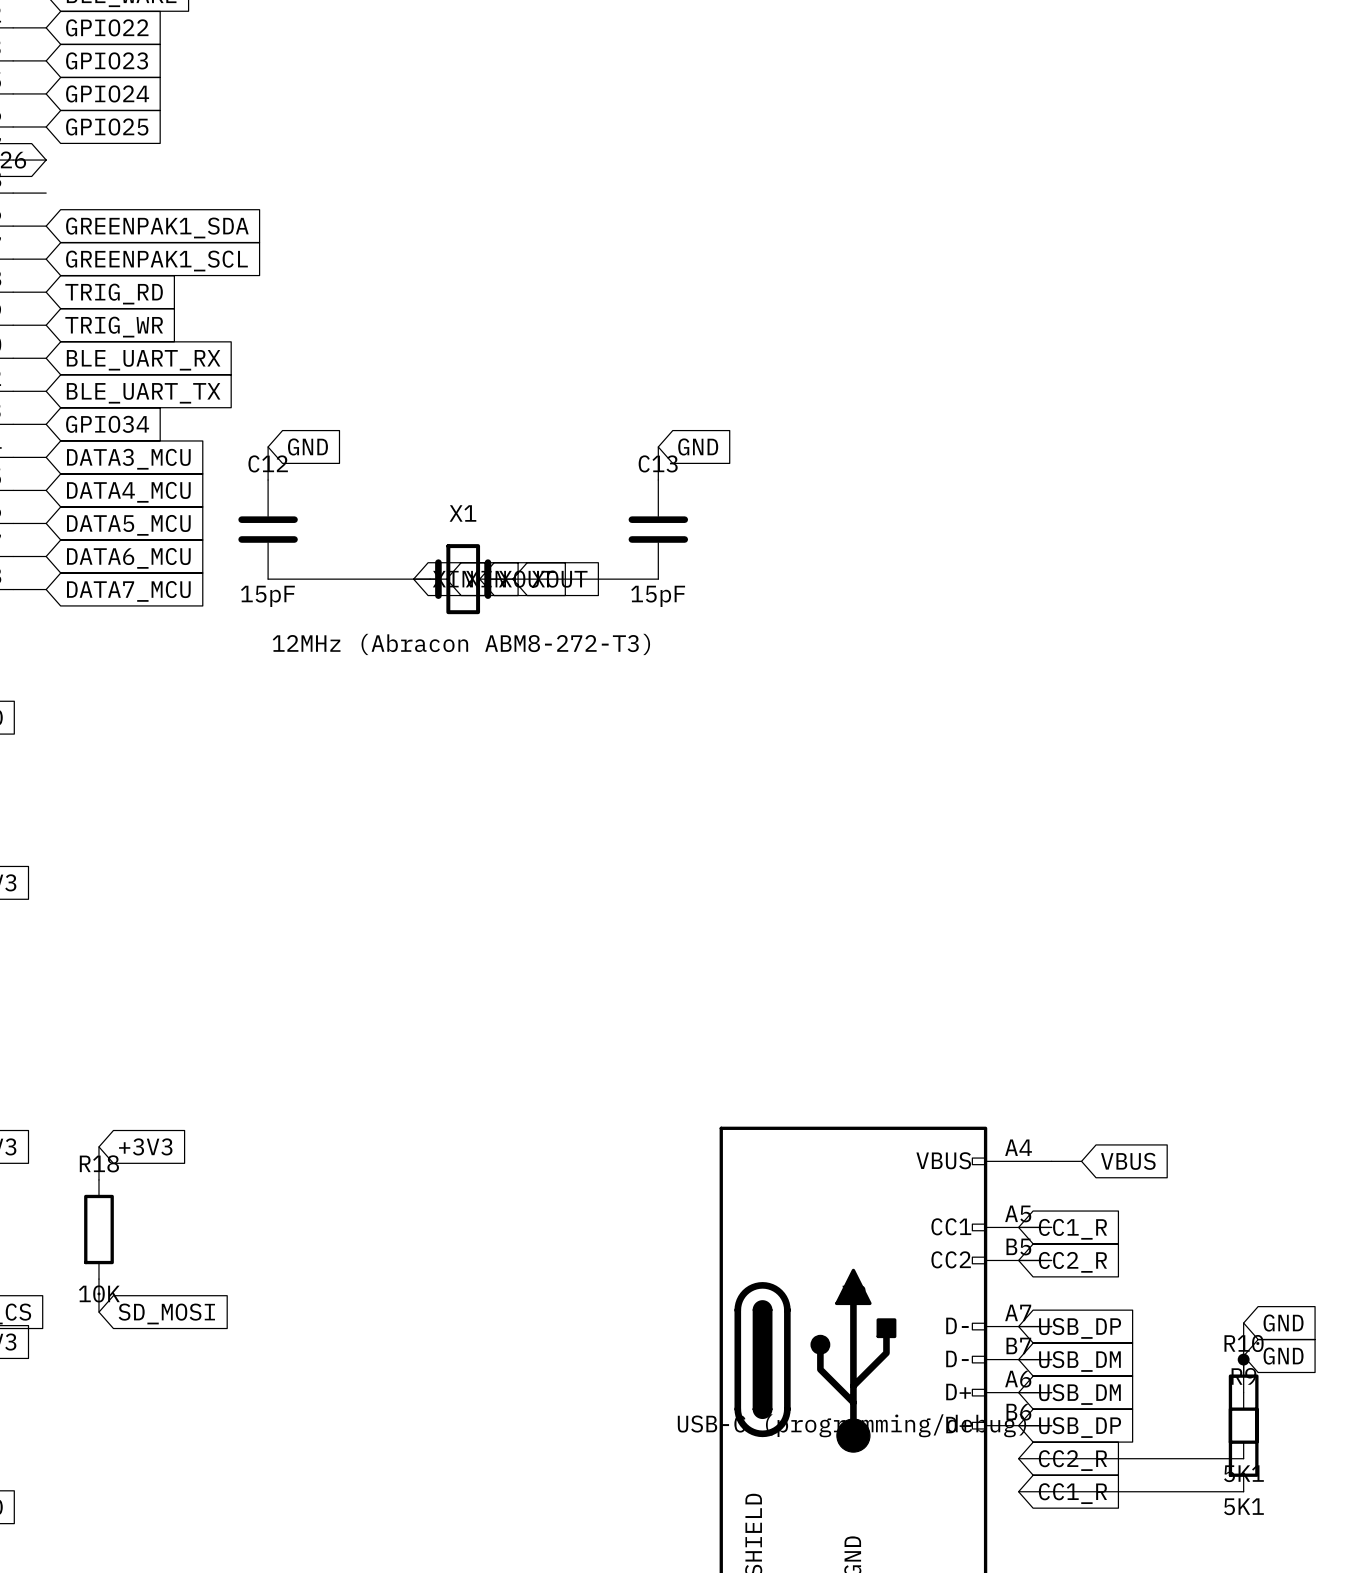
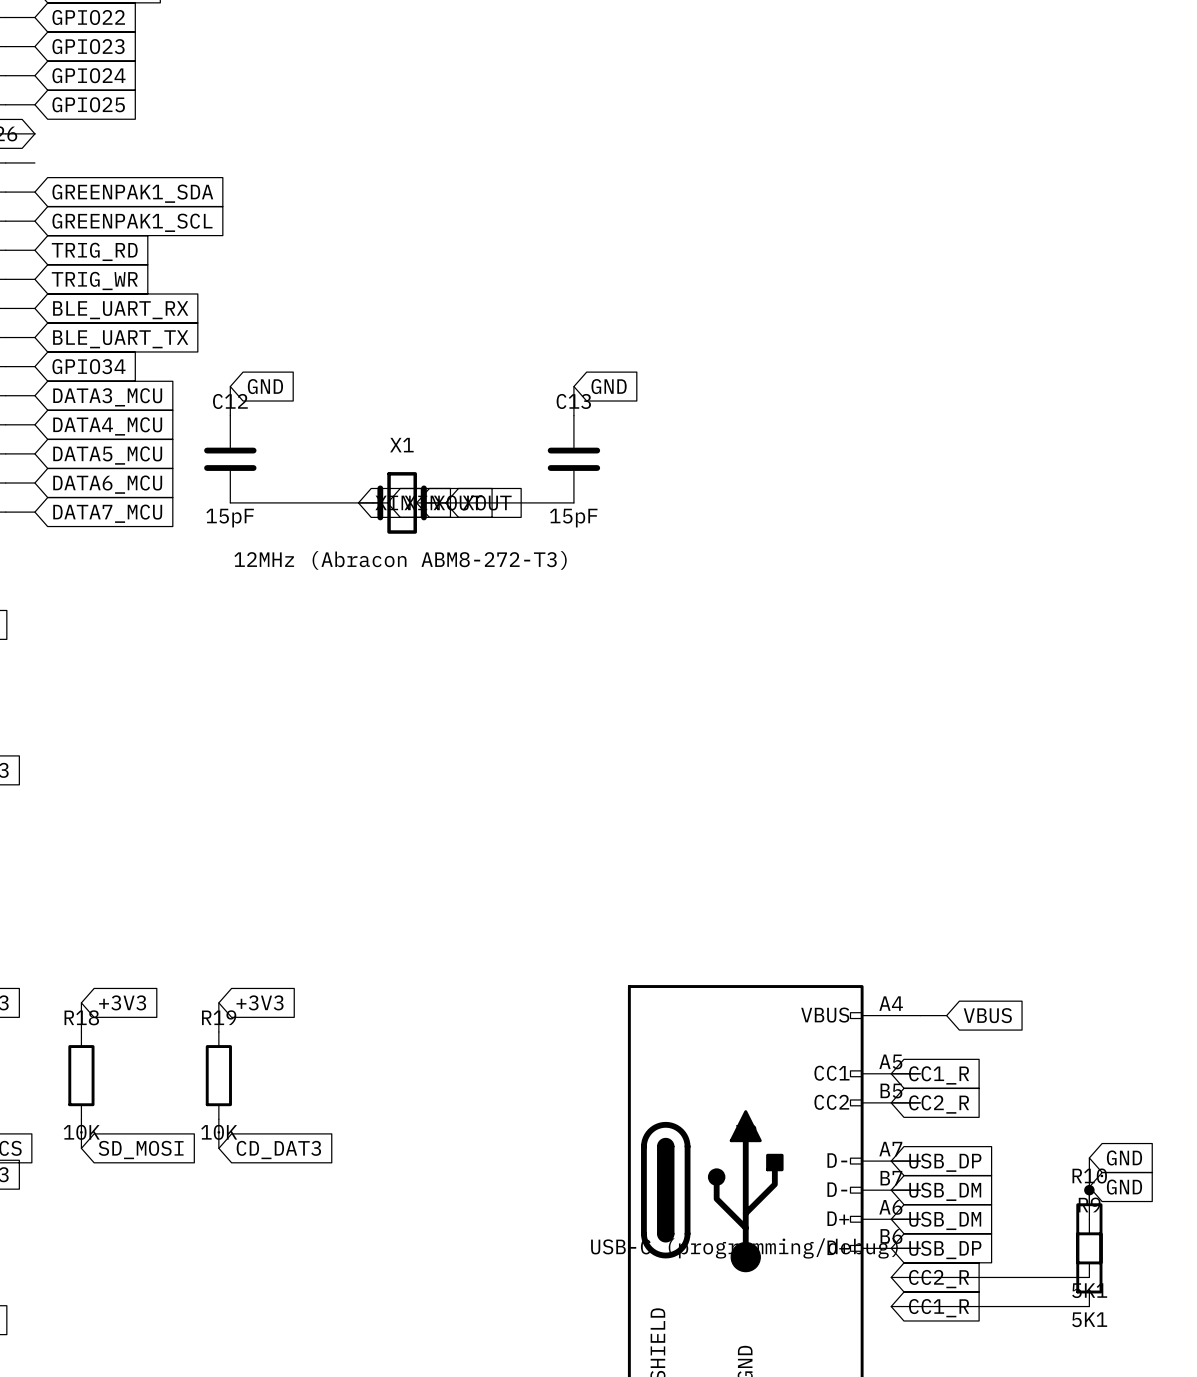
wire: none -> (218, 1002) (218, 1031)
global label: none -> +3V3 (260, 1002)
R19: none -> 10K (218, 1075)
wire: none -> (218, 1119) (218, 1148)
global label: none -> CD_DAT3 (278, 1150)

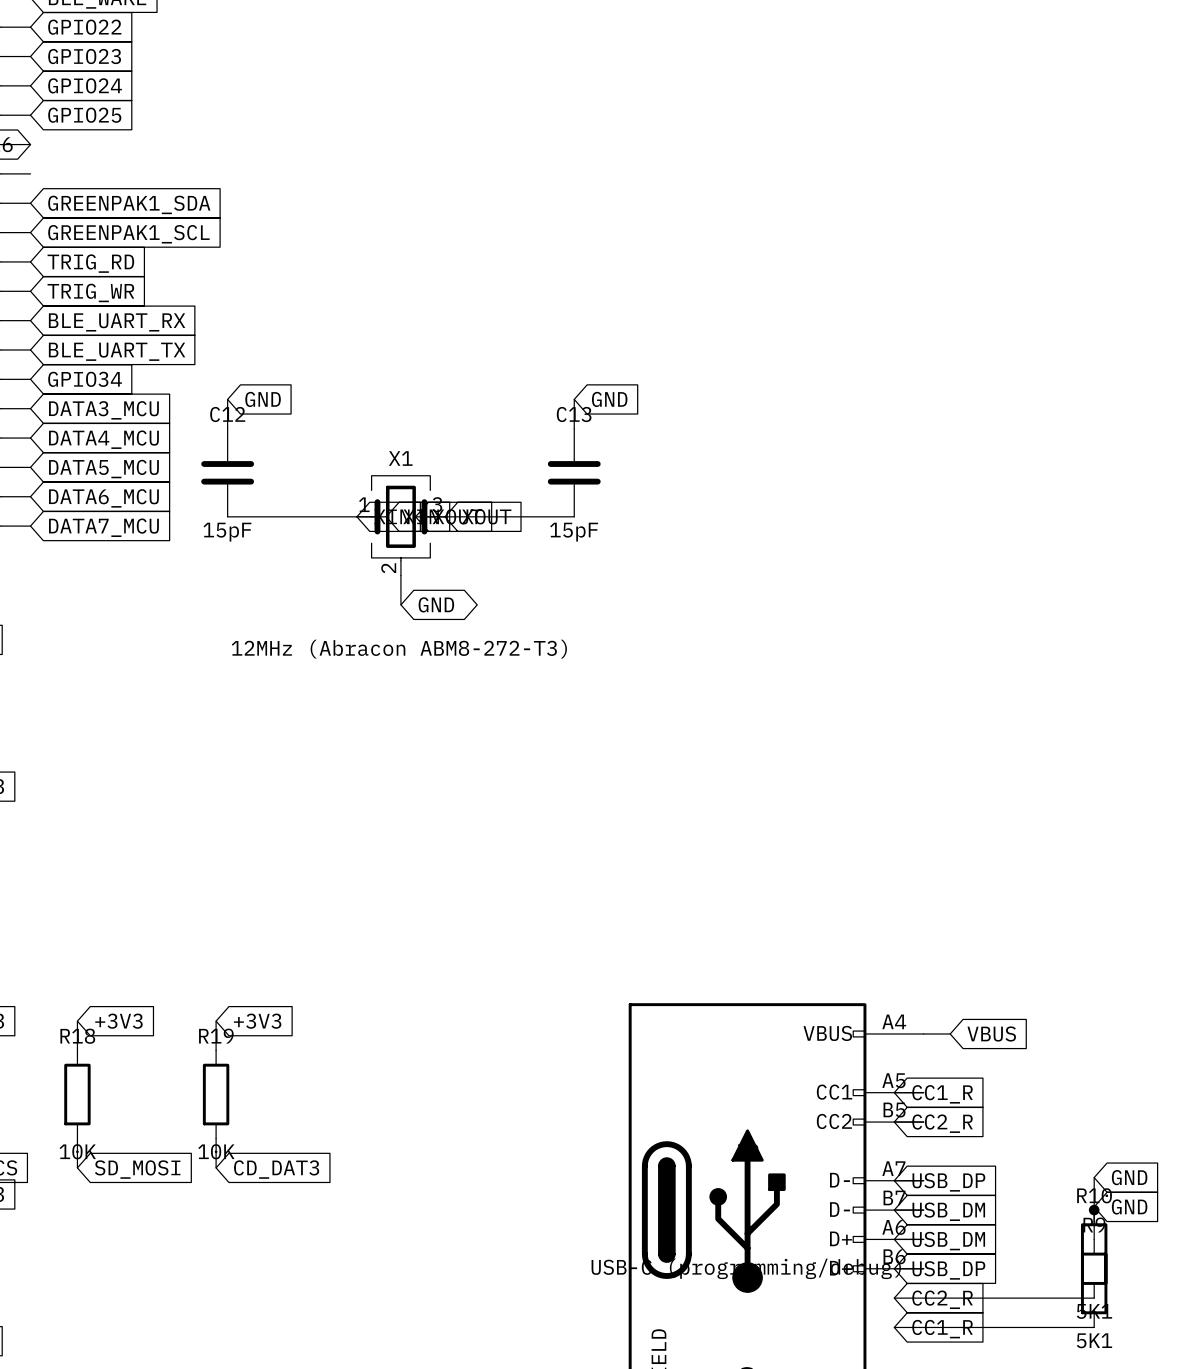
X1 symbol: [358, 472, 446, 534] -> [356, 475, 445, 576]
X1 value position: 12MHz (Abracon ABM8-272-T3) (400, 560) -> 12MHz (Abracon ABM8-272-T3) (399, 649)
wire: none -> (400, 575) (400, 604)
global label: none -> GND (436, 604)

